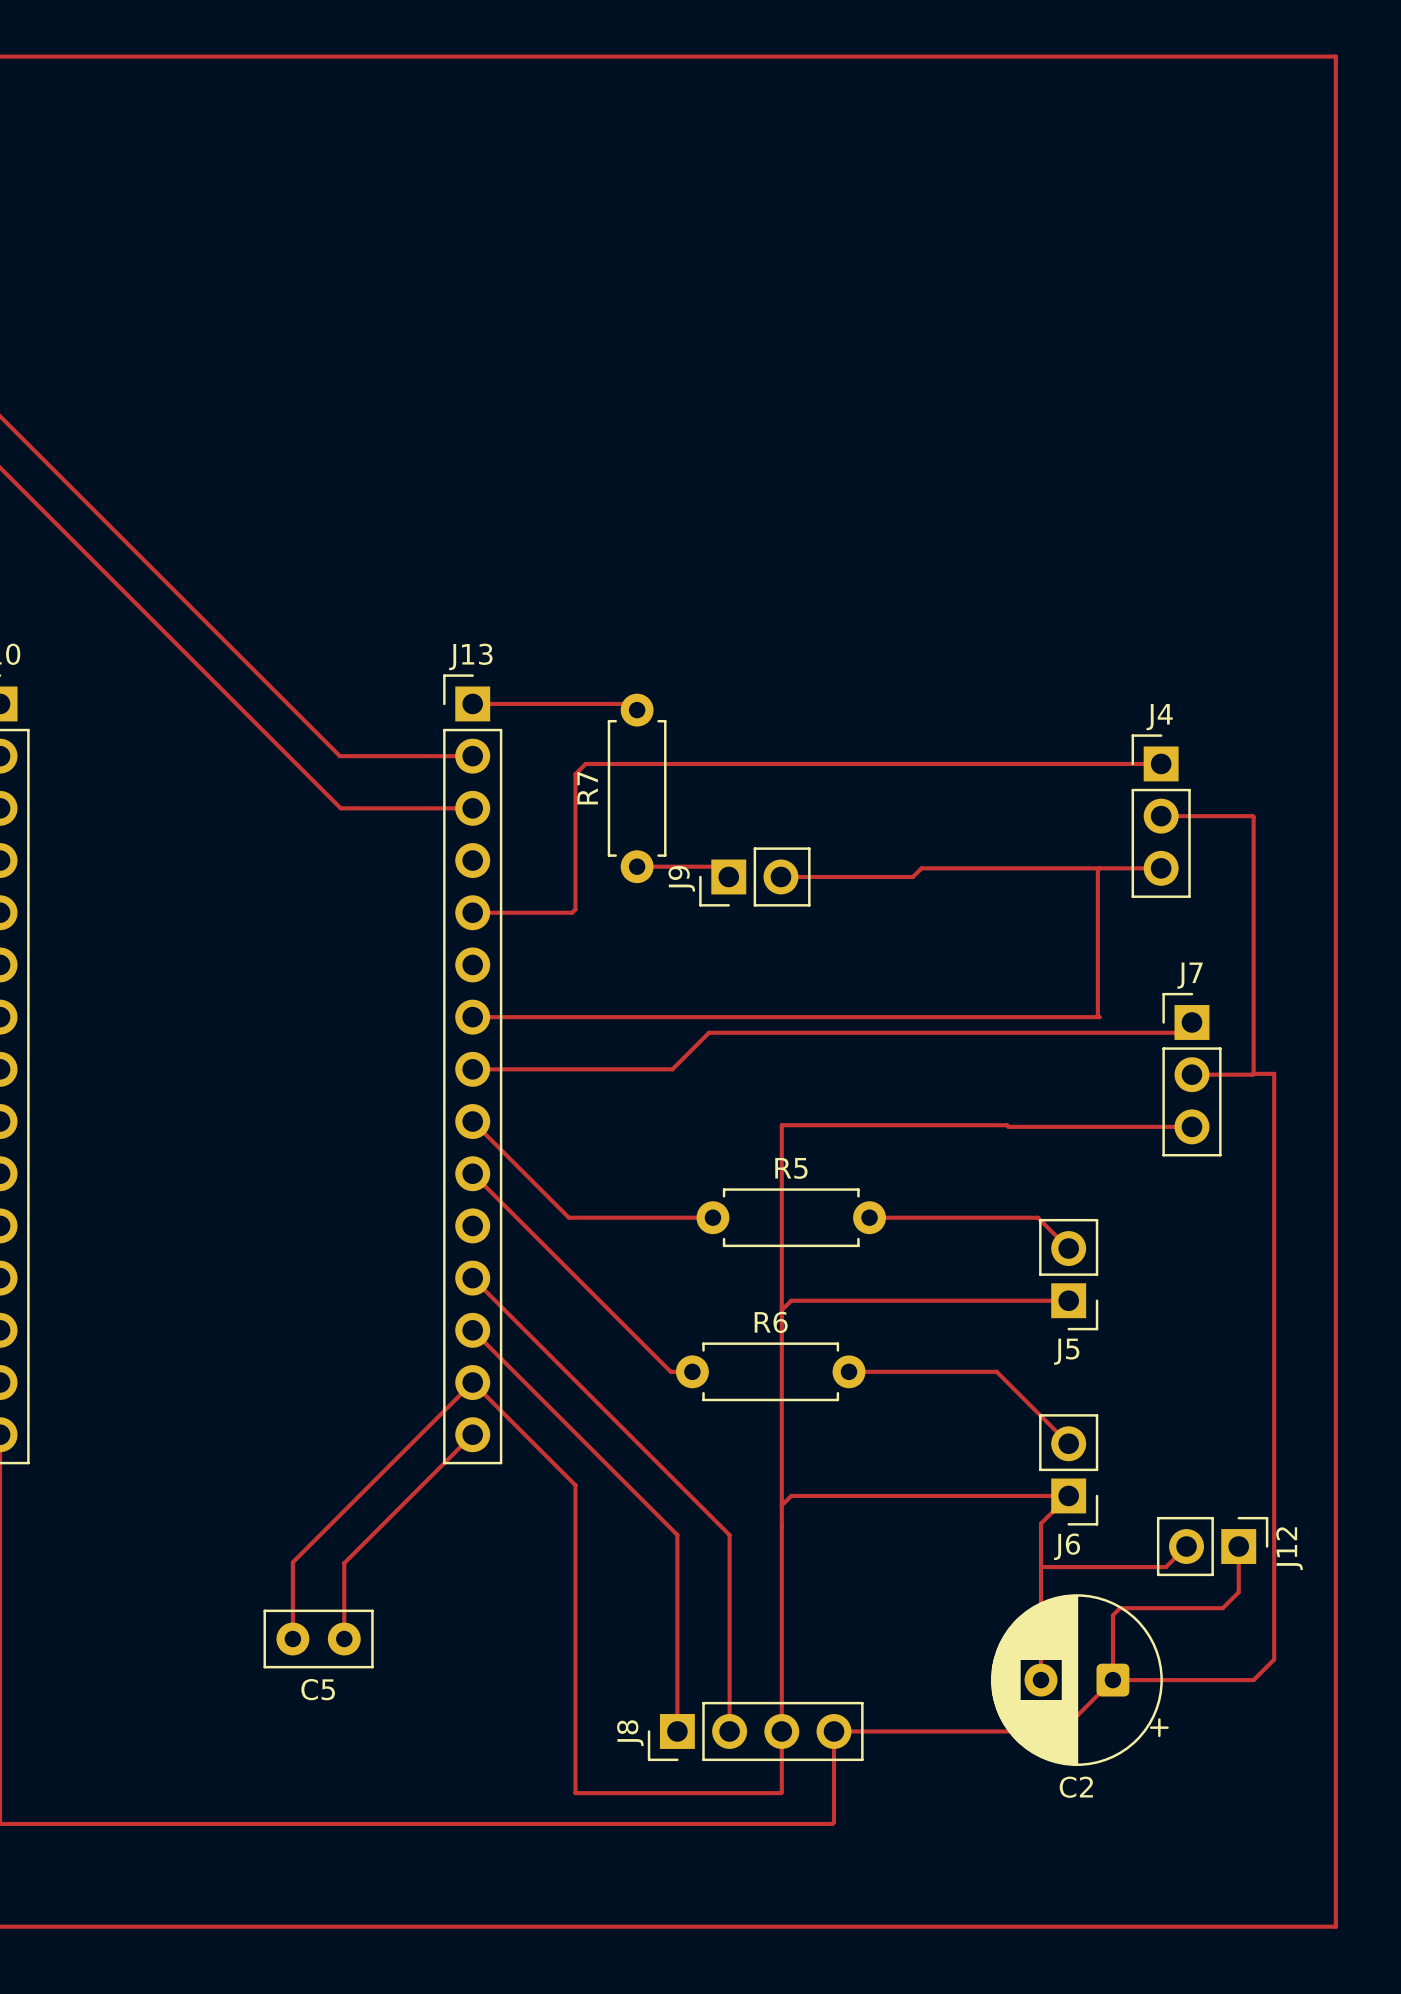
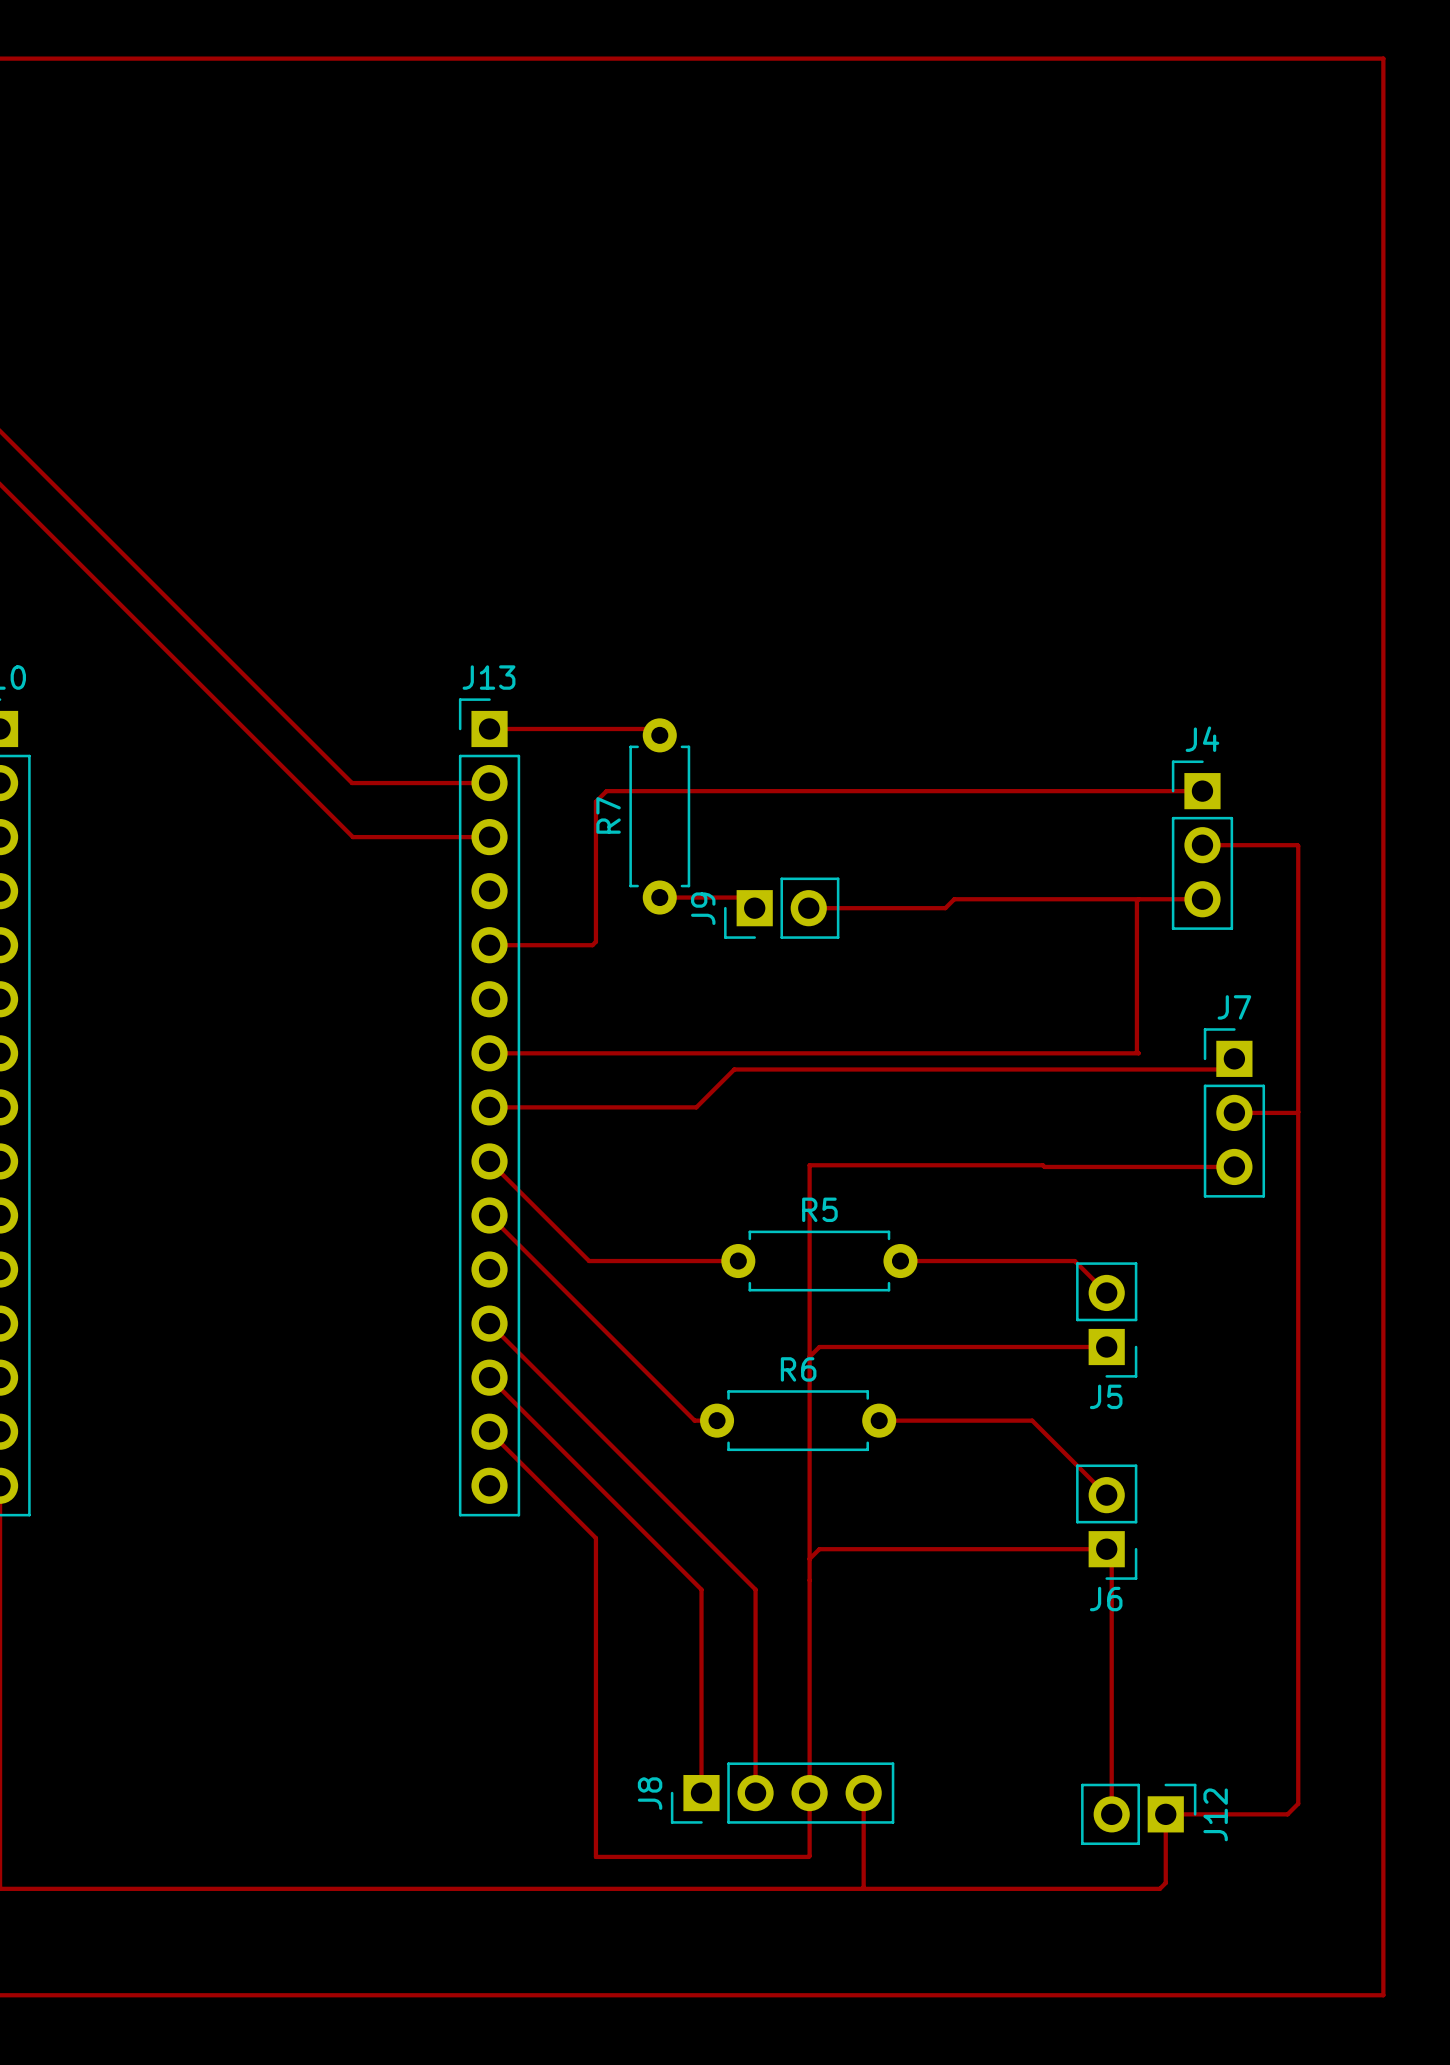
track: (1253, 1073) (1274, 1073) (1274, 1659) (1253, 1680) (1112, 1680) -> (1298, 1112) (1298, 1803) (1287, 1814) (1165, 1814) (1165, 1882) (1159, 1888) (861, 1888)
track: (472, 1382) (292, 1562) (292, 1638) -> none
track: (472, 1434) (344, 1563) (344, 1638) -> none
track: (1068, 1495) (1040, 1523) (1040, 1680) -> none
track: none -> (1111, 1554) (1111, 1814)
track: (1186, 1546) (1165, 1567) (1040, 1567) -> none
J12 position: (1212, 1546) -> (1138, 1814)
track: (1238, 1546) (1238, 1592) (1222, 1608) (1120, 1608) (1112, 1615) (1112, 1680) -> none
C5: (318, 1638) -> none
C2: (1079, 1680) -> none
track: (1112, 1680) (1061, 1731) (833, 1731) -> none

